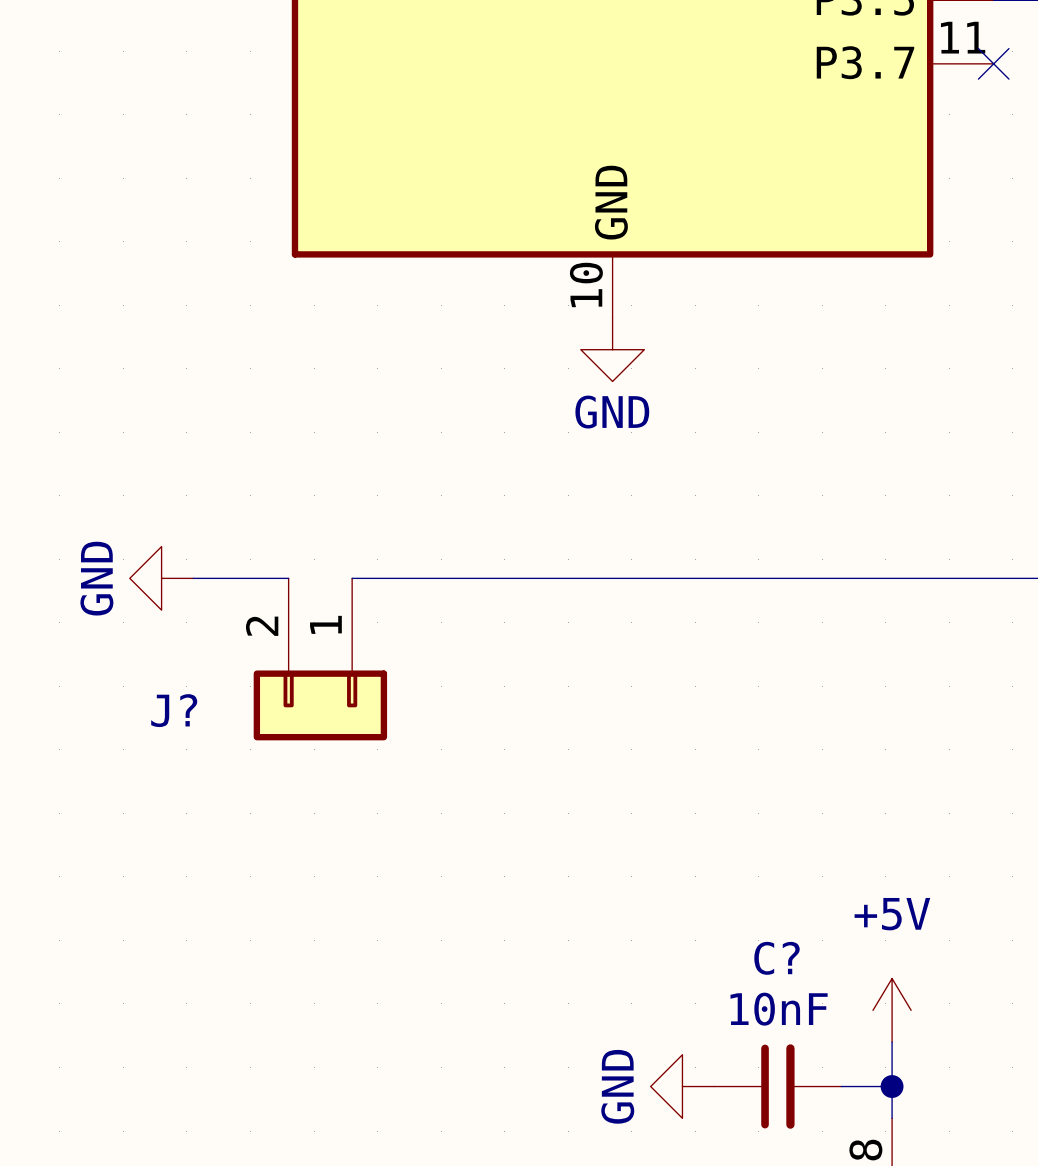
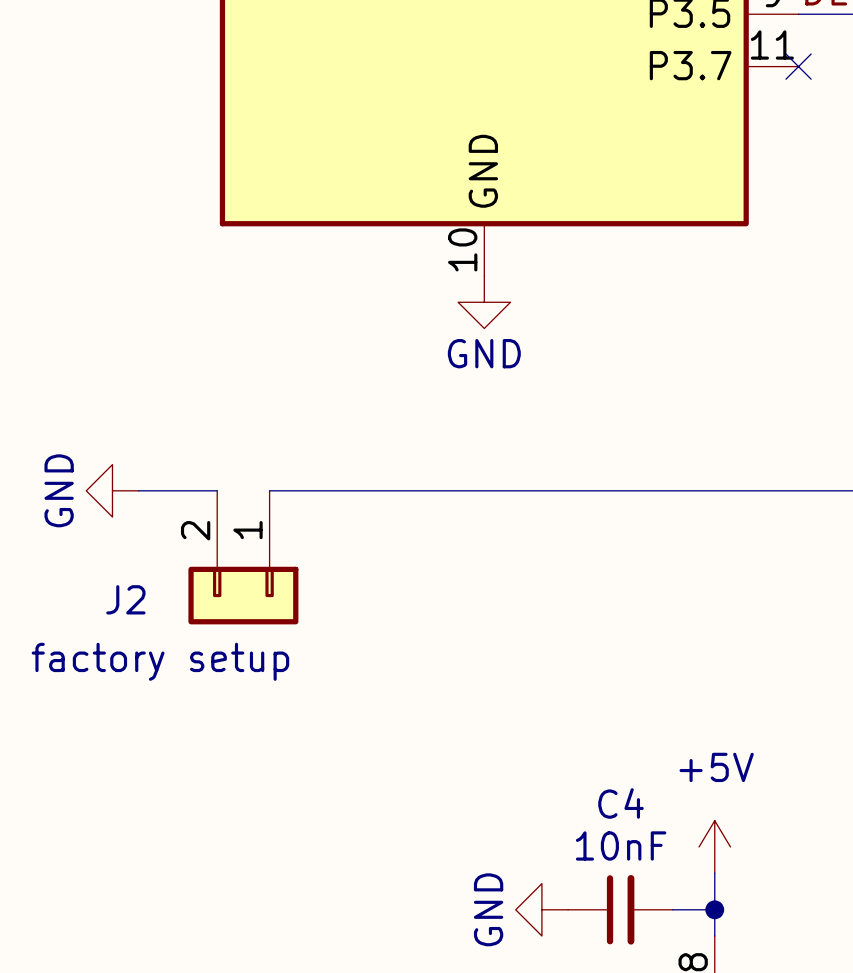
J? name: J? (174, 710) -> J2 (125, 599)
J? value: none -> factory setup (160, 661)
C? name: C? (777, 958) -> C4 (620, 803)

